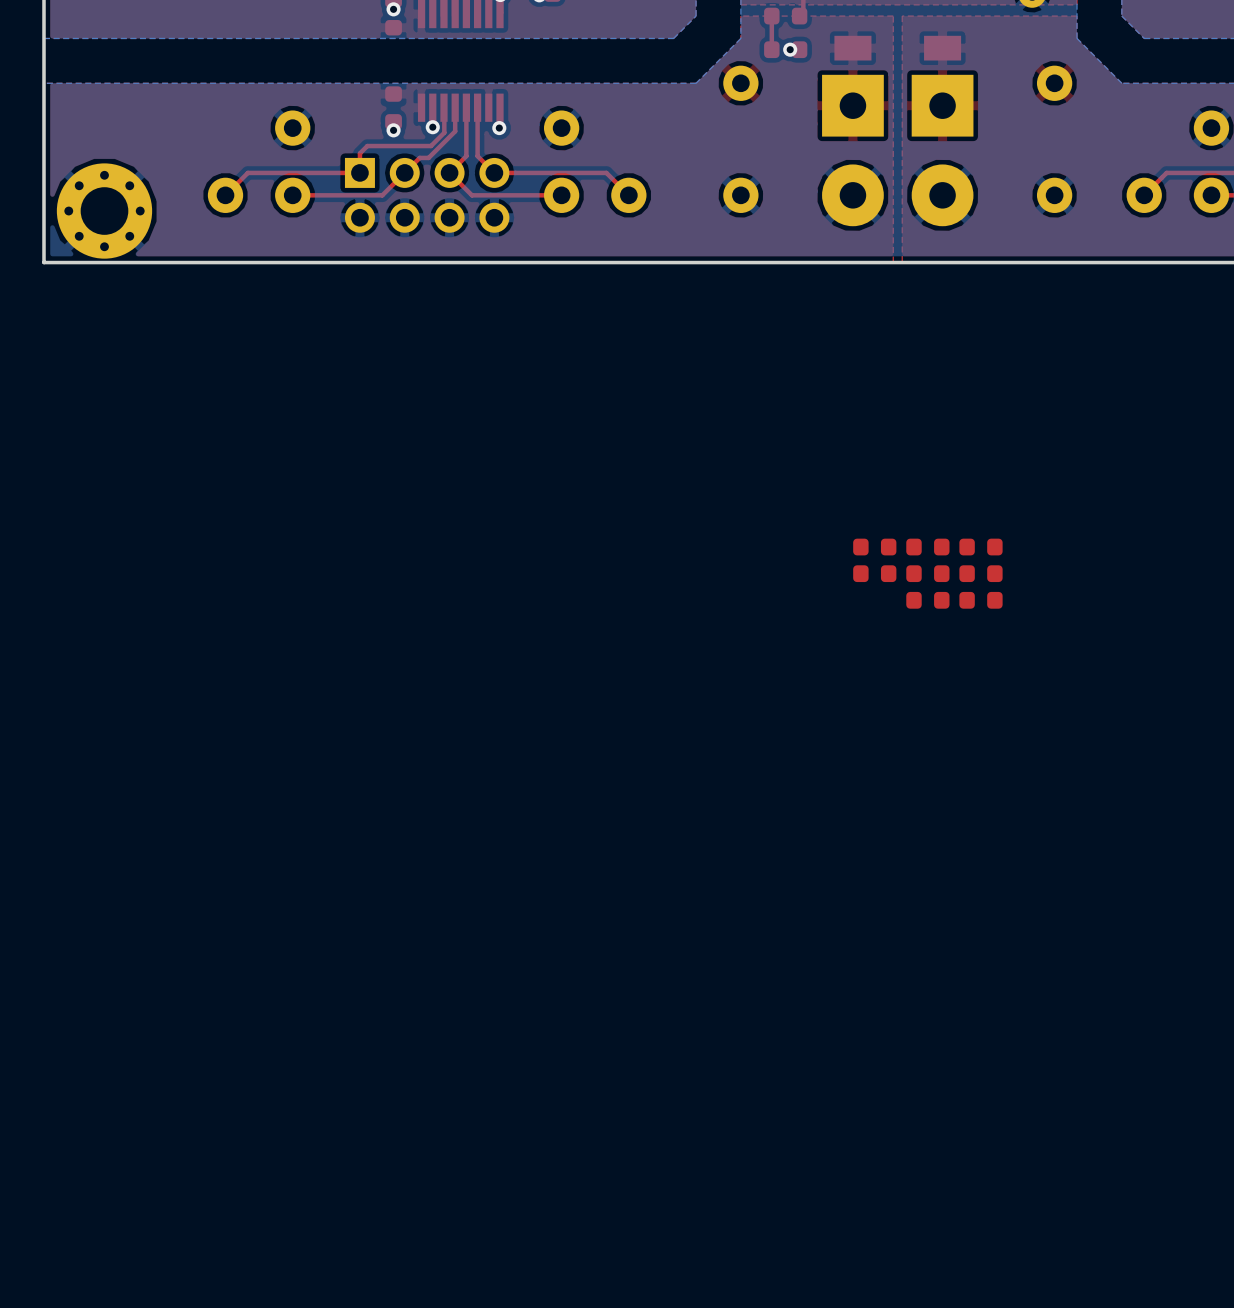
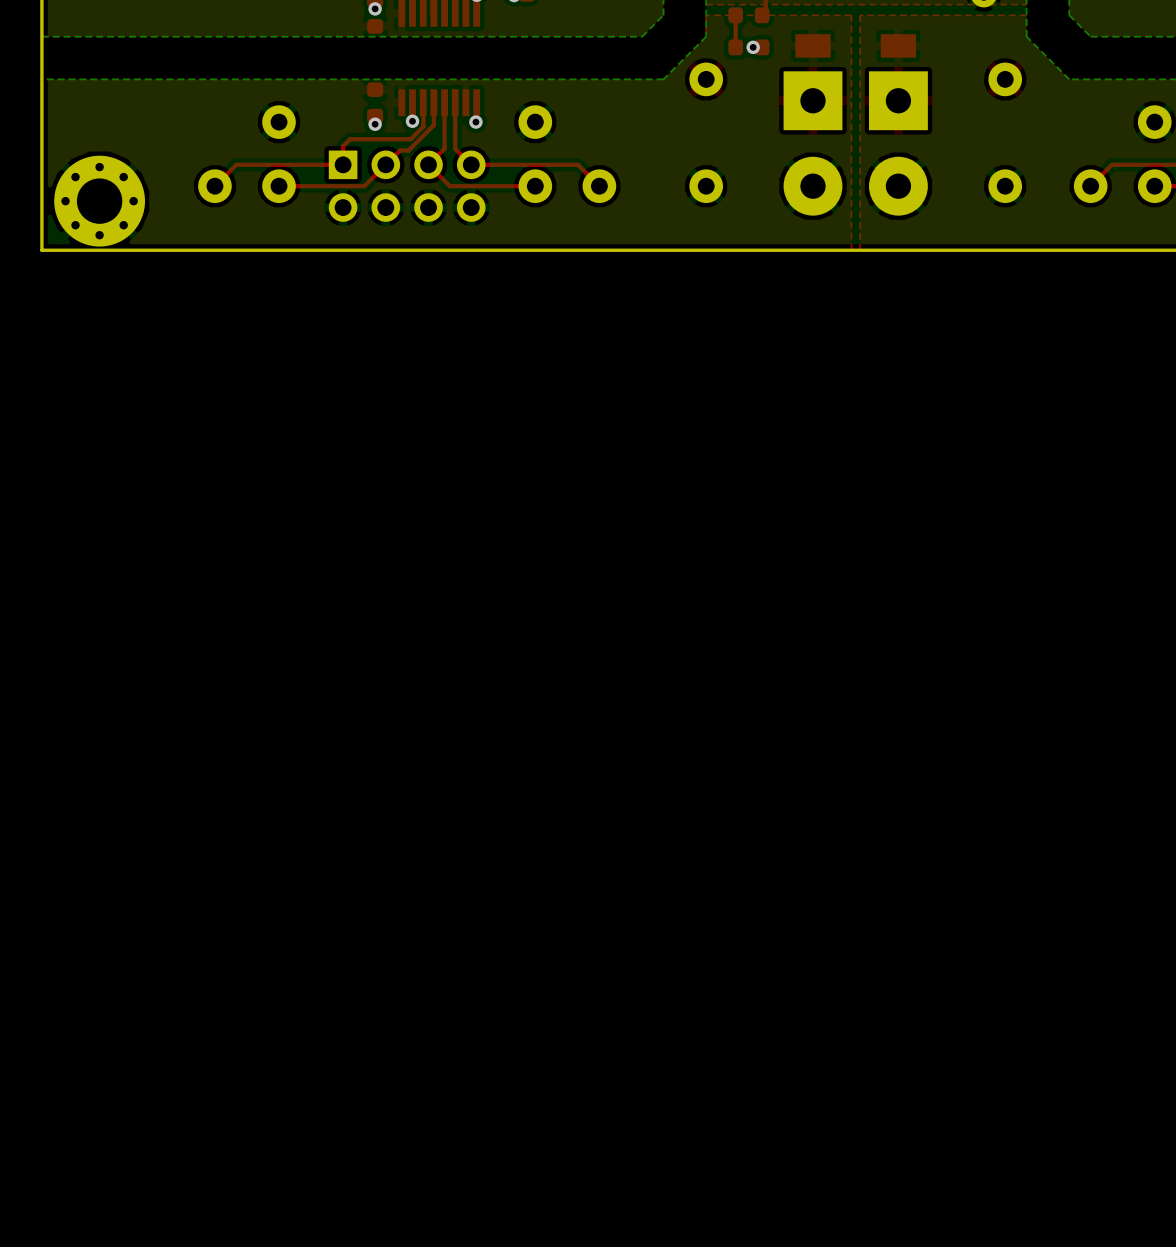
part: (874, 547) -> none
part: (927, 547) -> none
part: (981, 547) -> none
part: (874, 573) -> none
part: (927, 573) -> none
part: (981, 573) -> none
part: (927, 600) -> none
part: (981, 600) -> none

